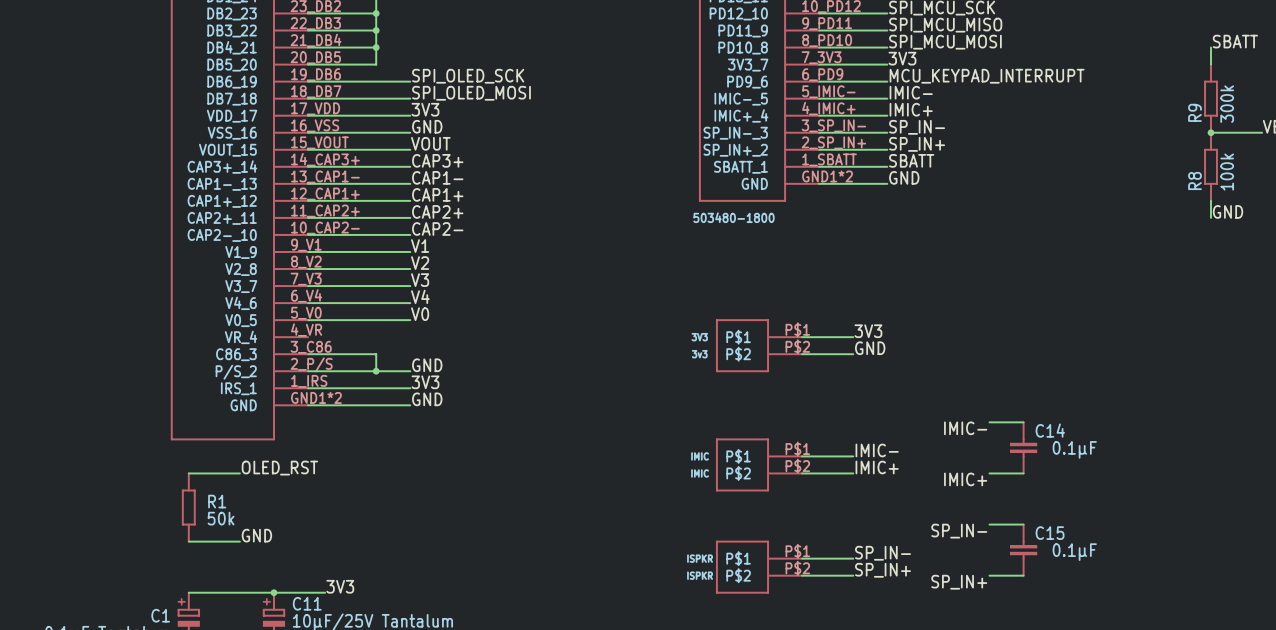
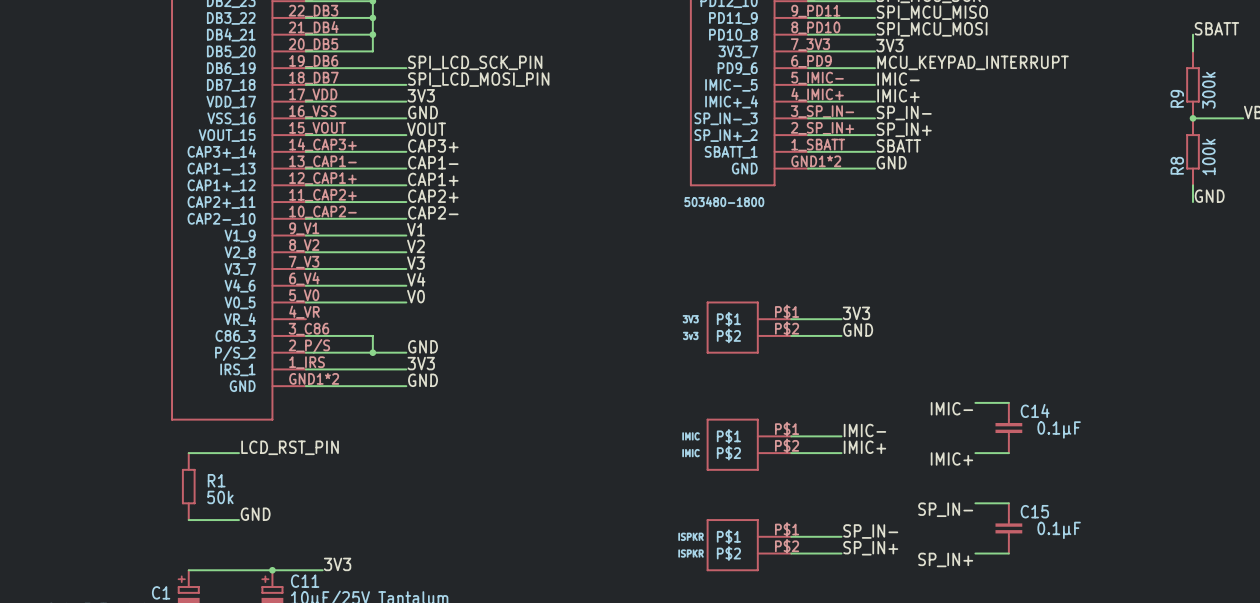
label: SPI_OLED_SCK (468, 76) -> SPI_LCD_SCK_PIN (475, 62)
label: SPI_OLED_MOSI (471, 93) -> SPI_LCD_MOSI_PIN (478, 79)
label: OLED_RST (279, 468) -> LCD_RST_PIN (290, 447)

